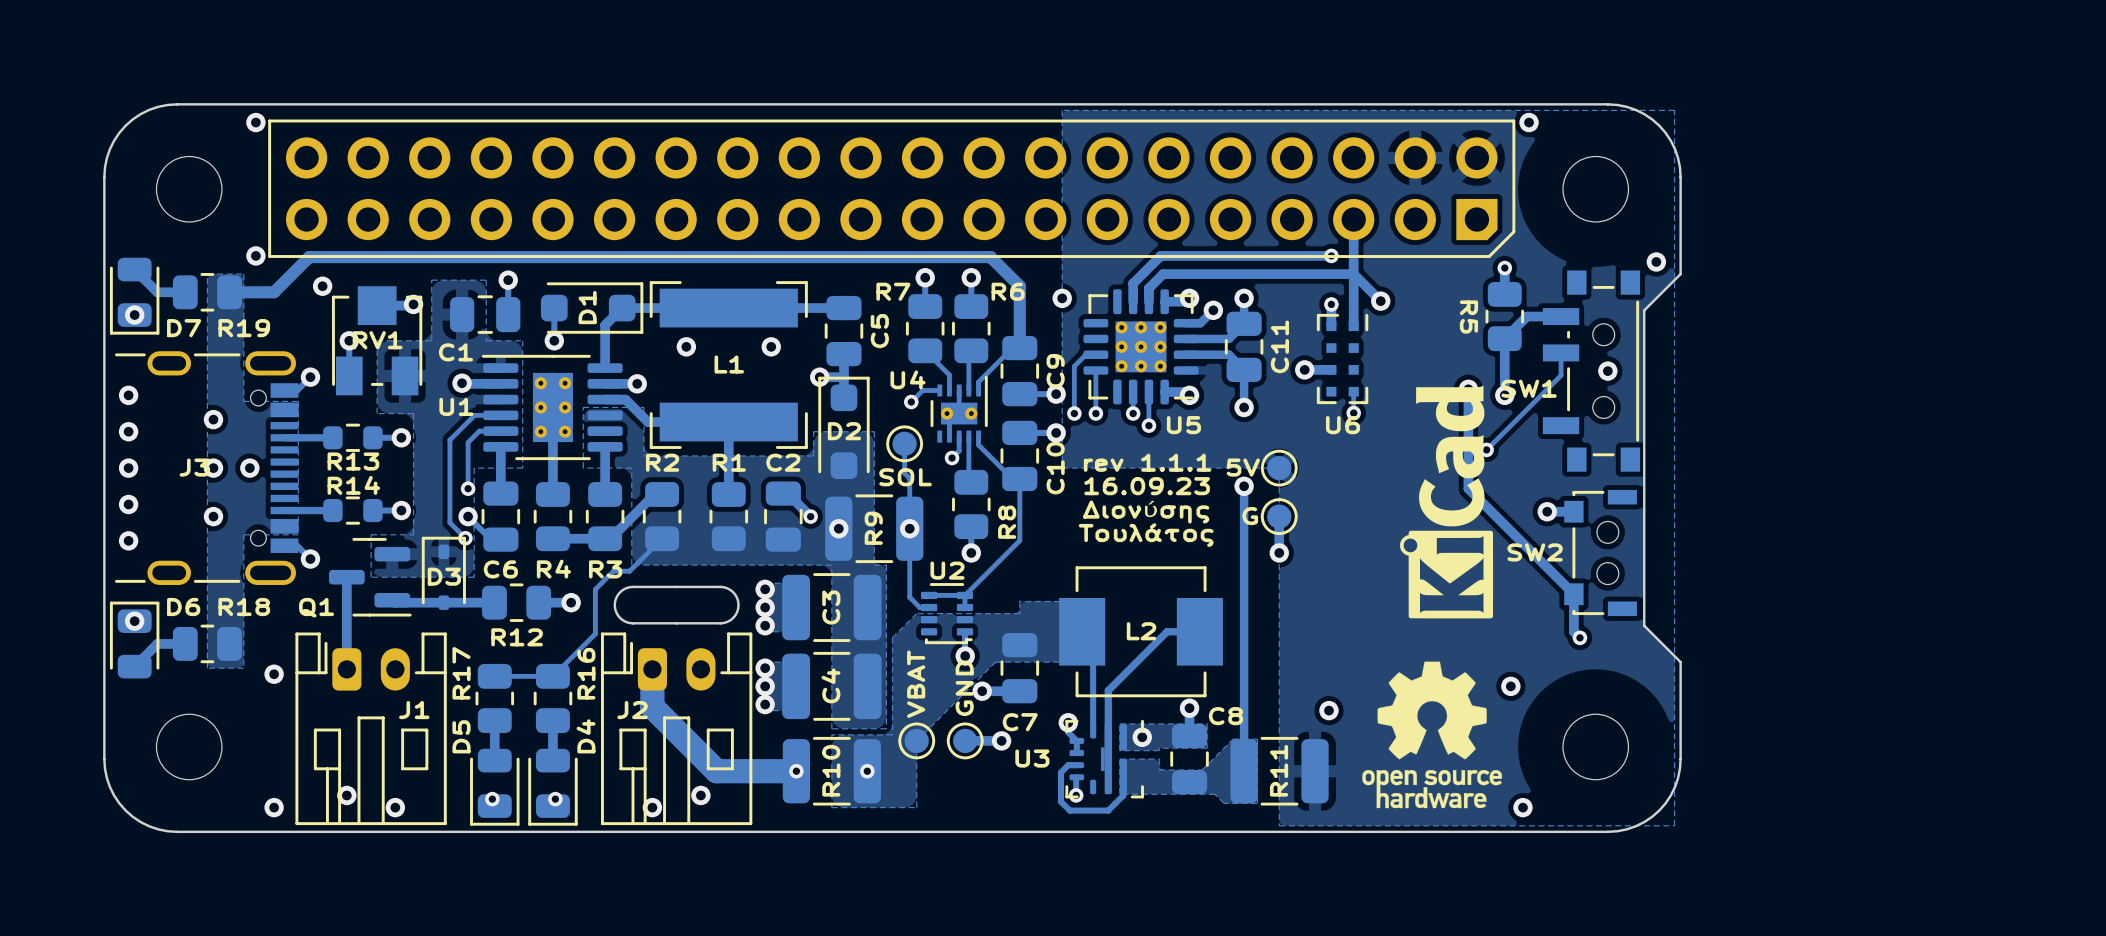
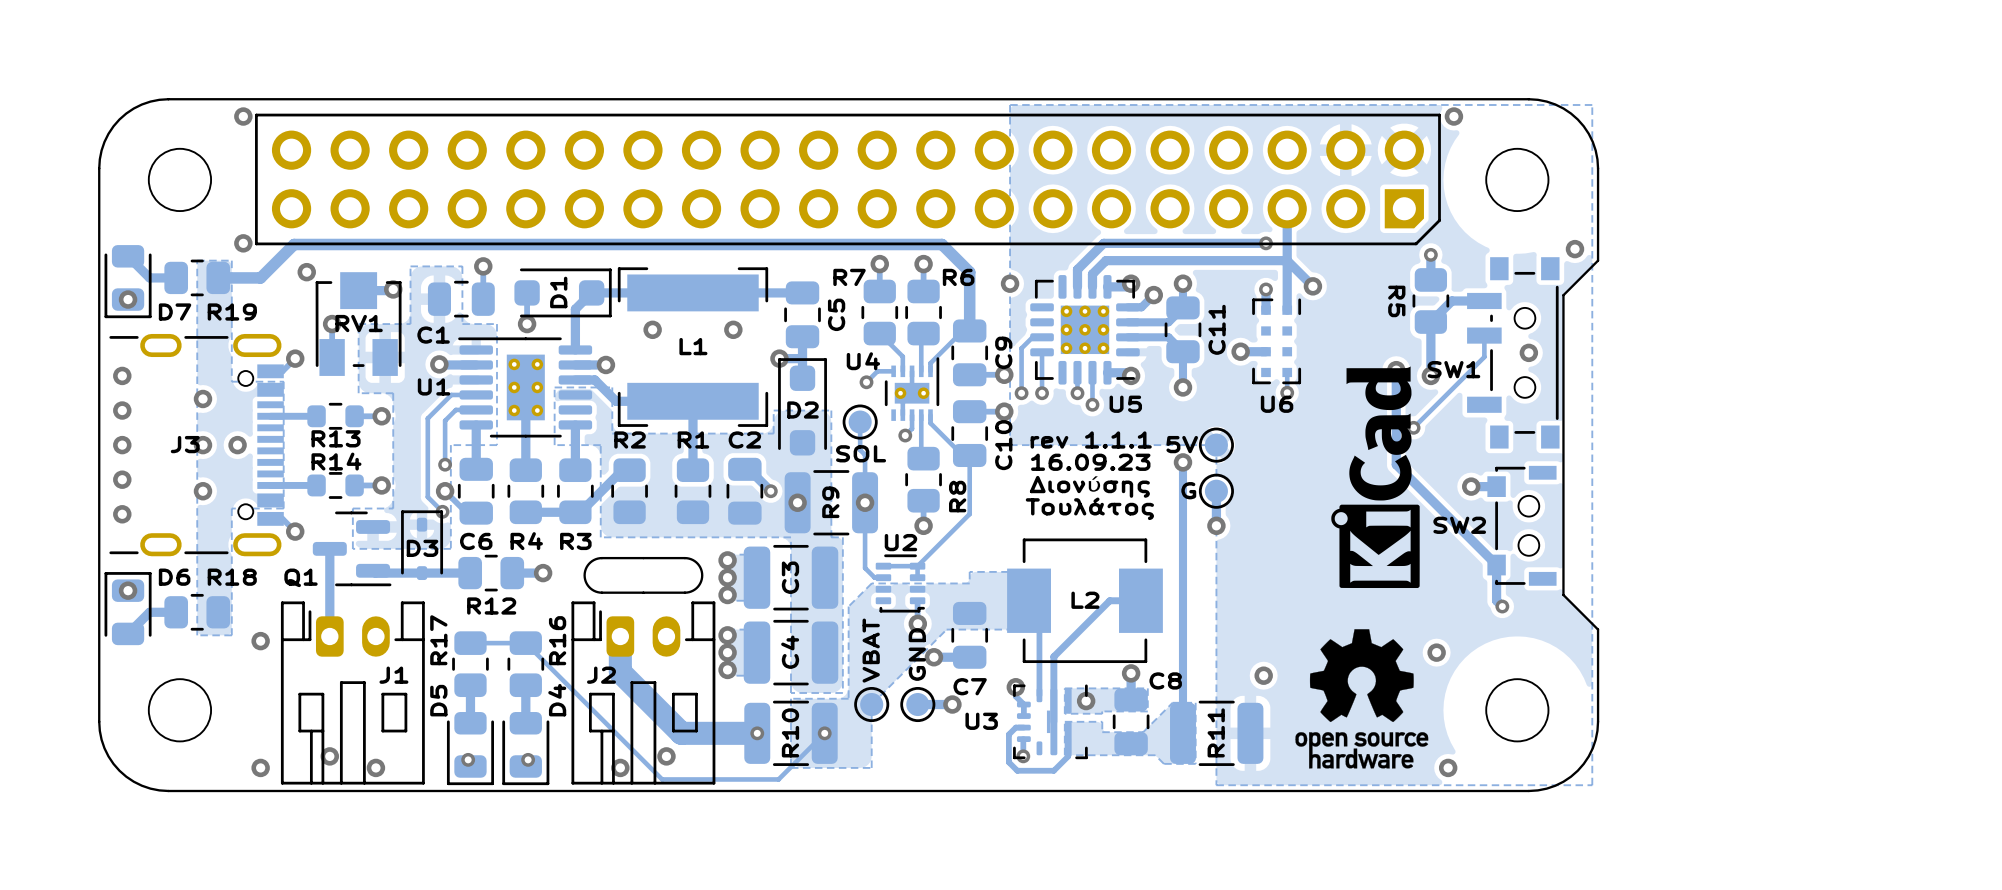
track: (662, 538) (629, 571) (613, 571) (595, 589) (595, 633) (552, 676) -> (824, 733) (778, 779) (662, 779) (525, 643)

